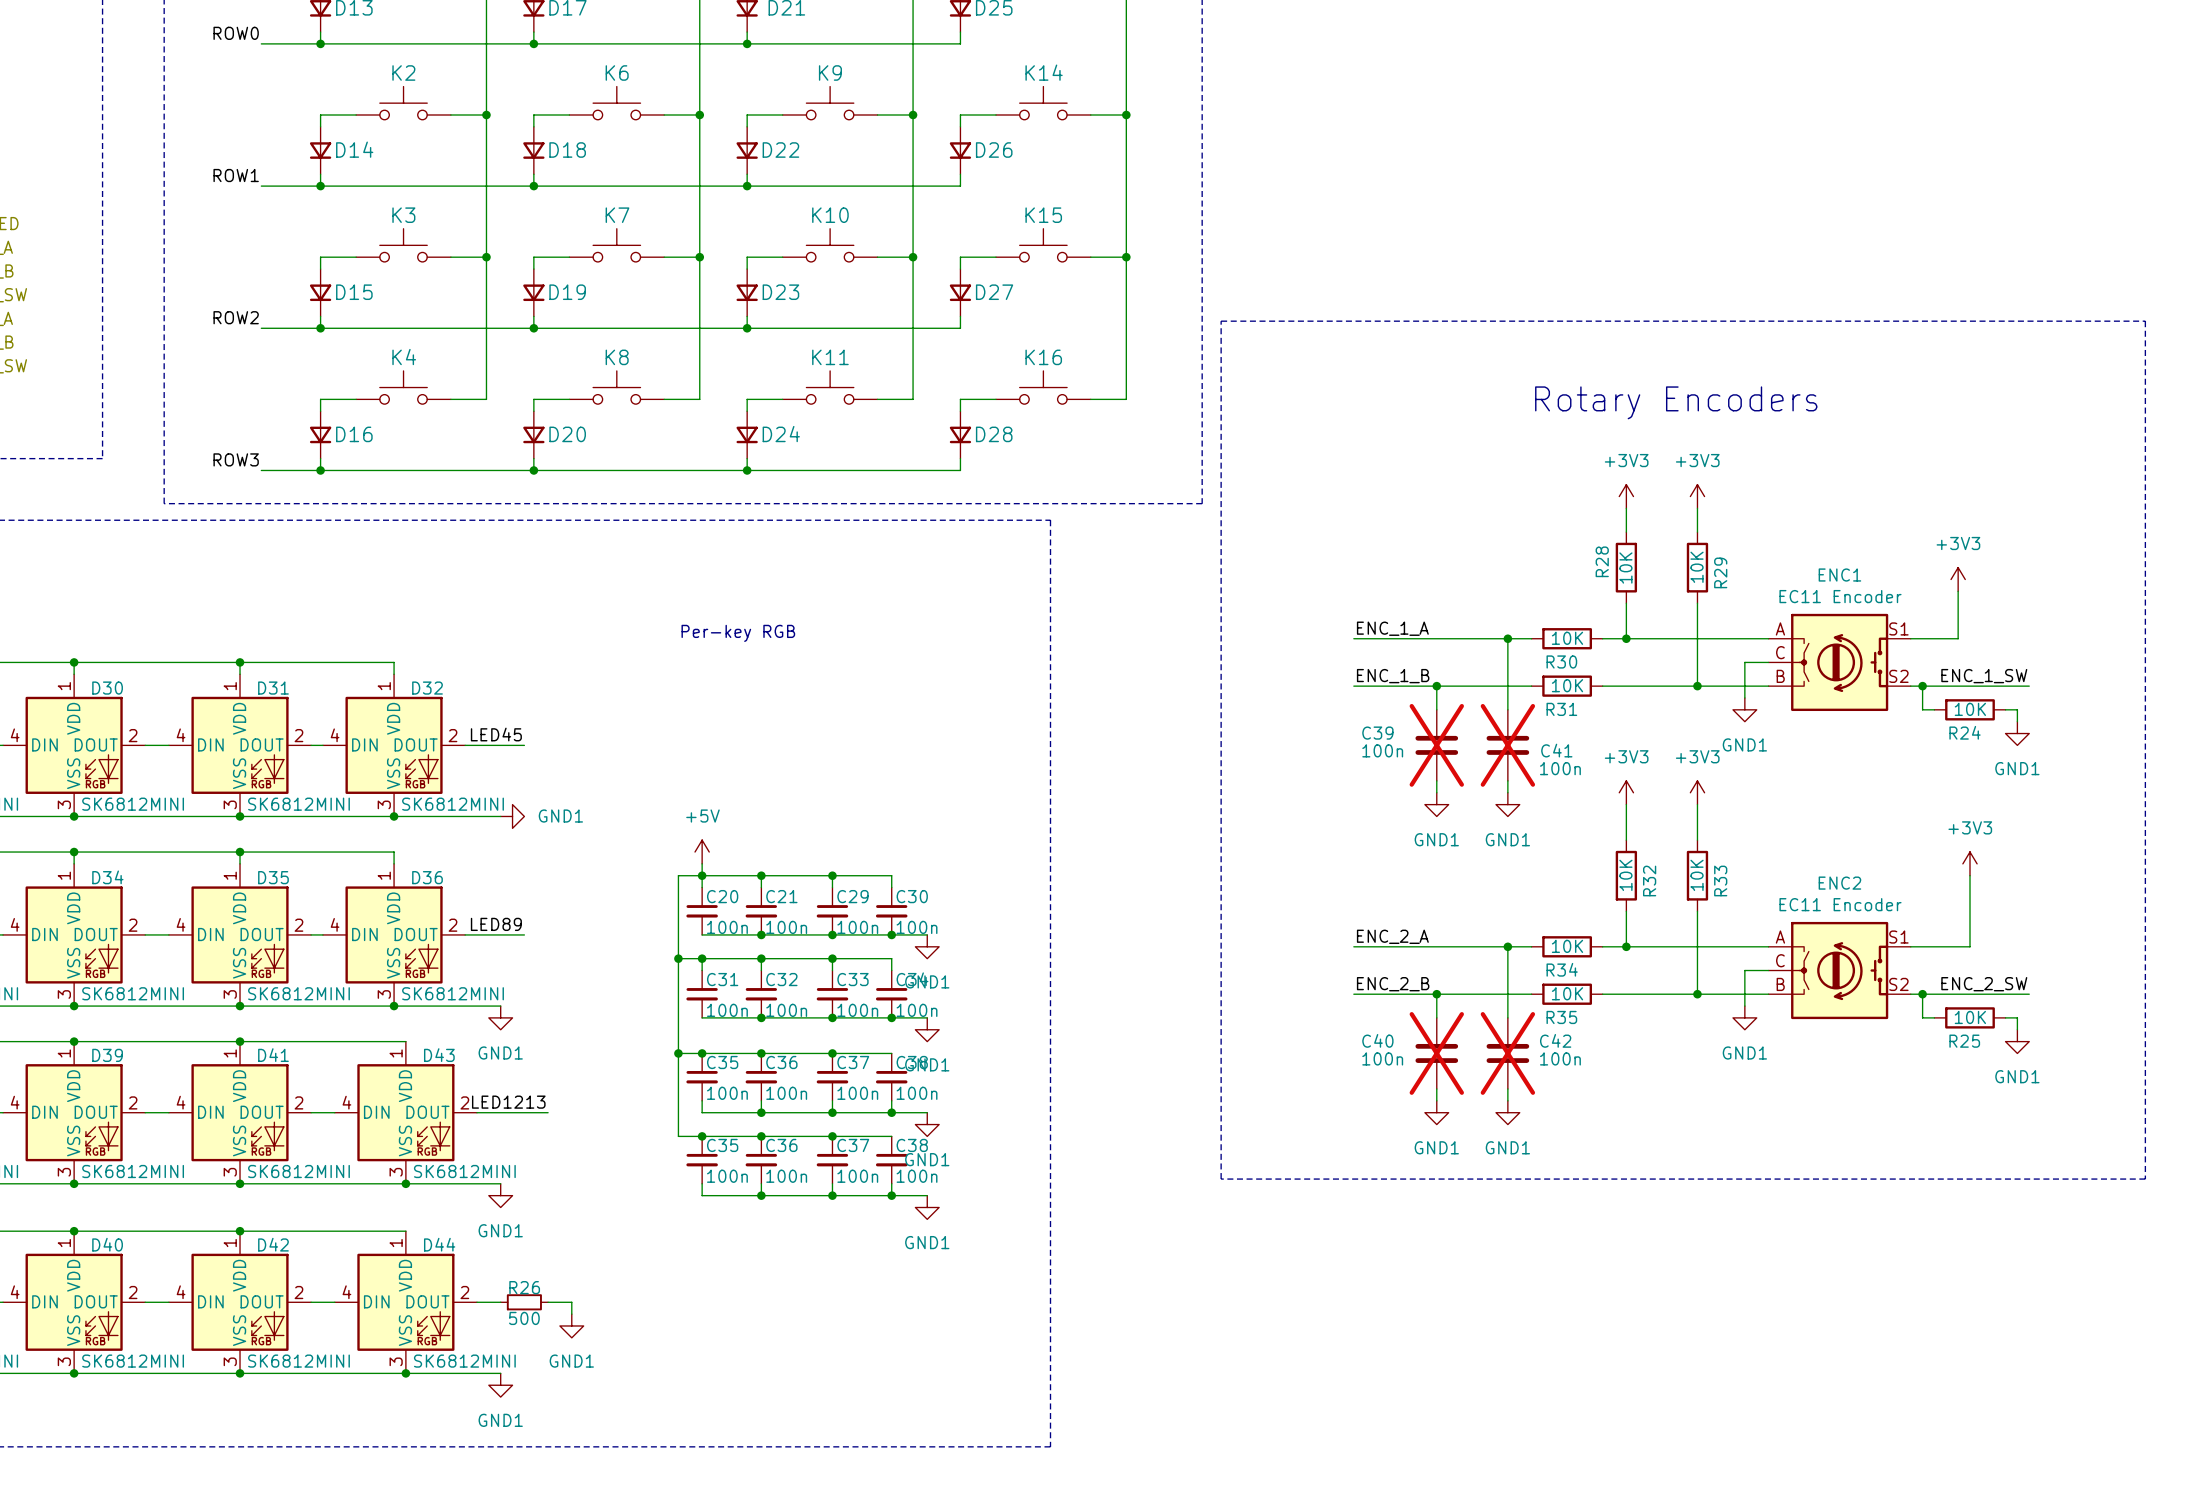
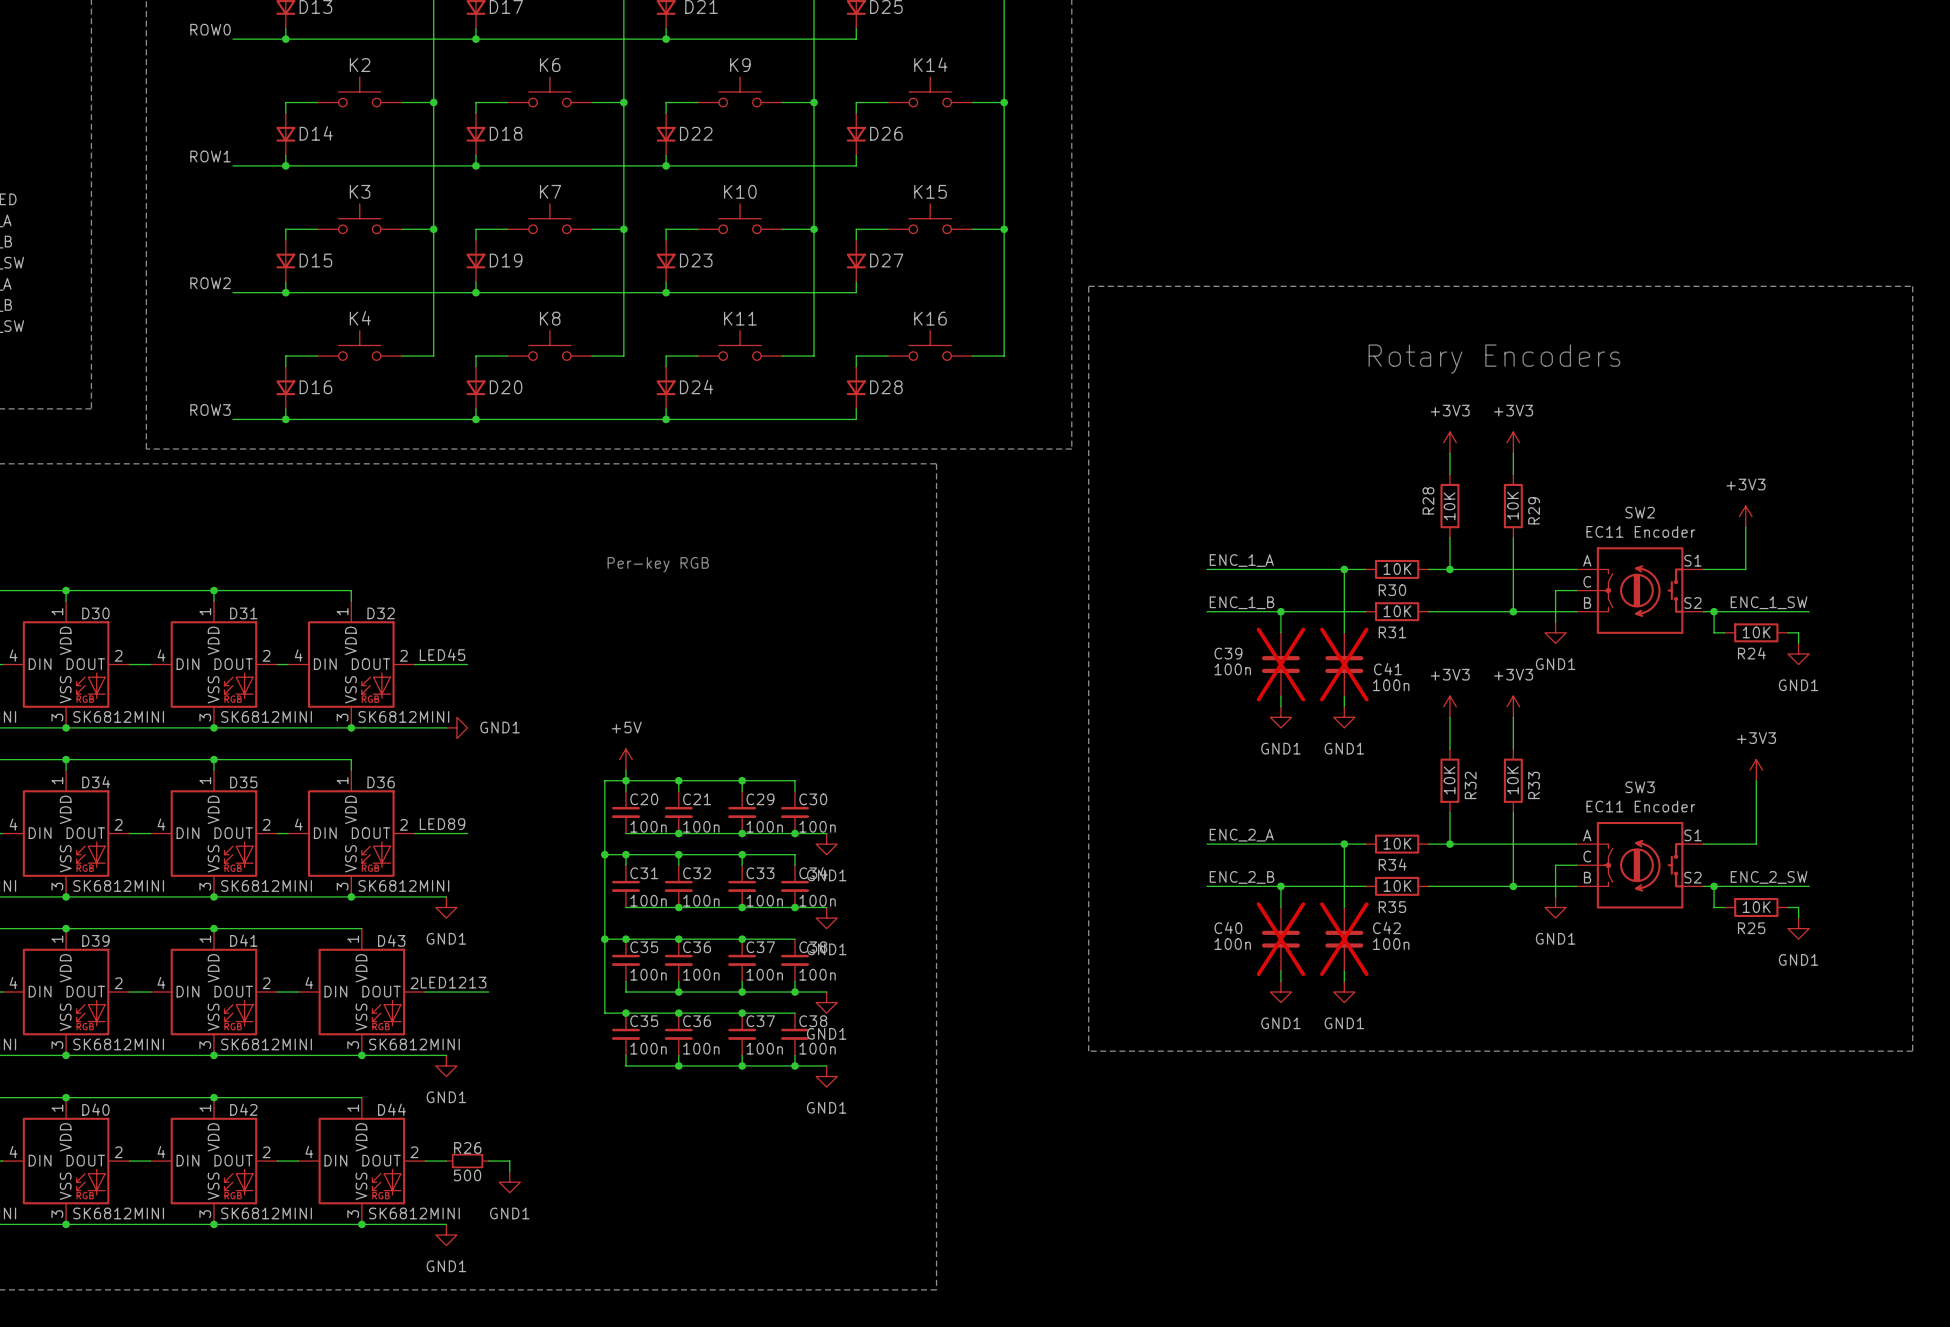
ENC1 name: ENC1 (1839, 575) -> SW2 (1640, 512)
ENC2 name: ENC2 (1839, 883) -> SW3 (1640, 787)

